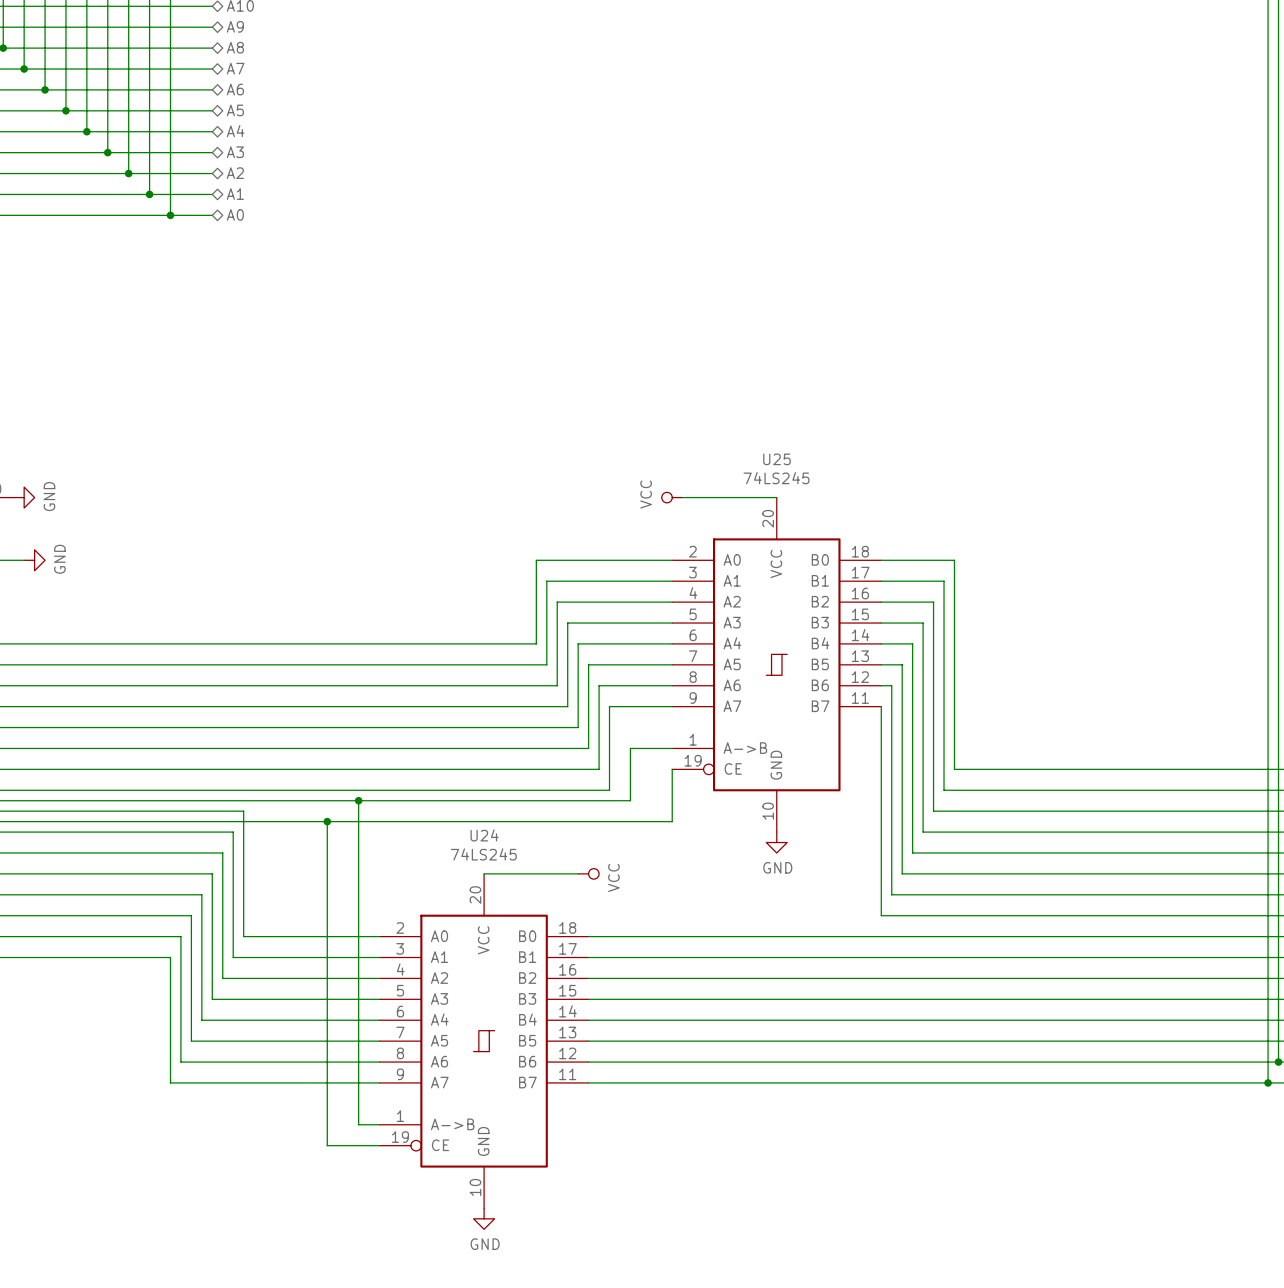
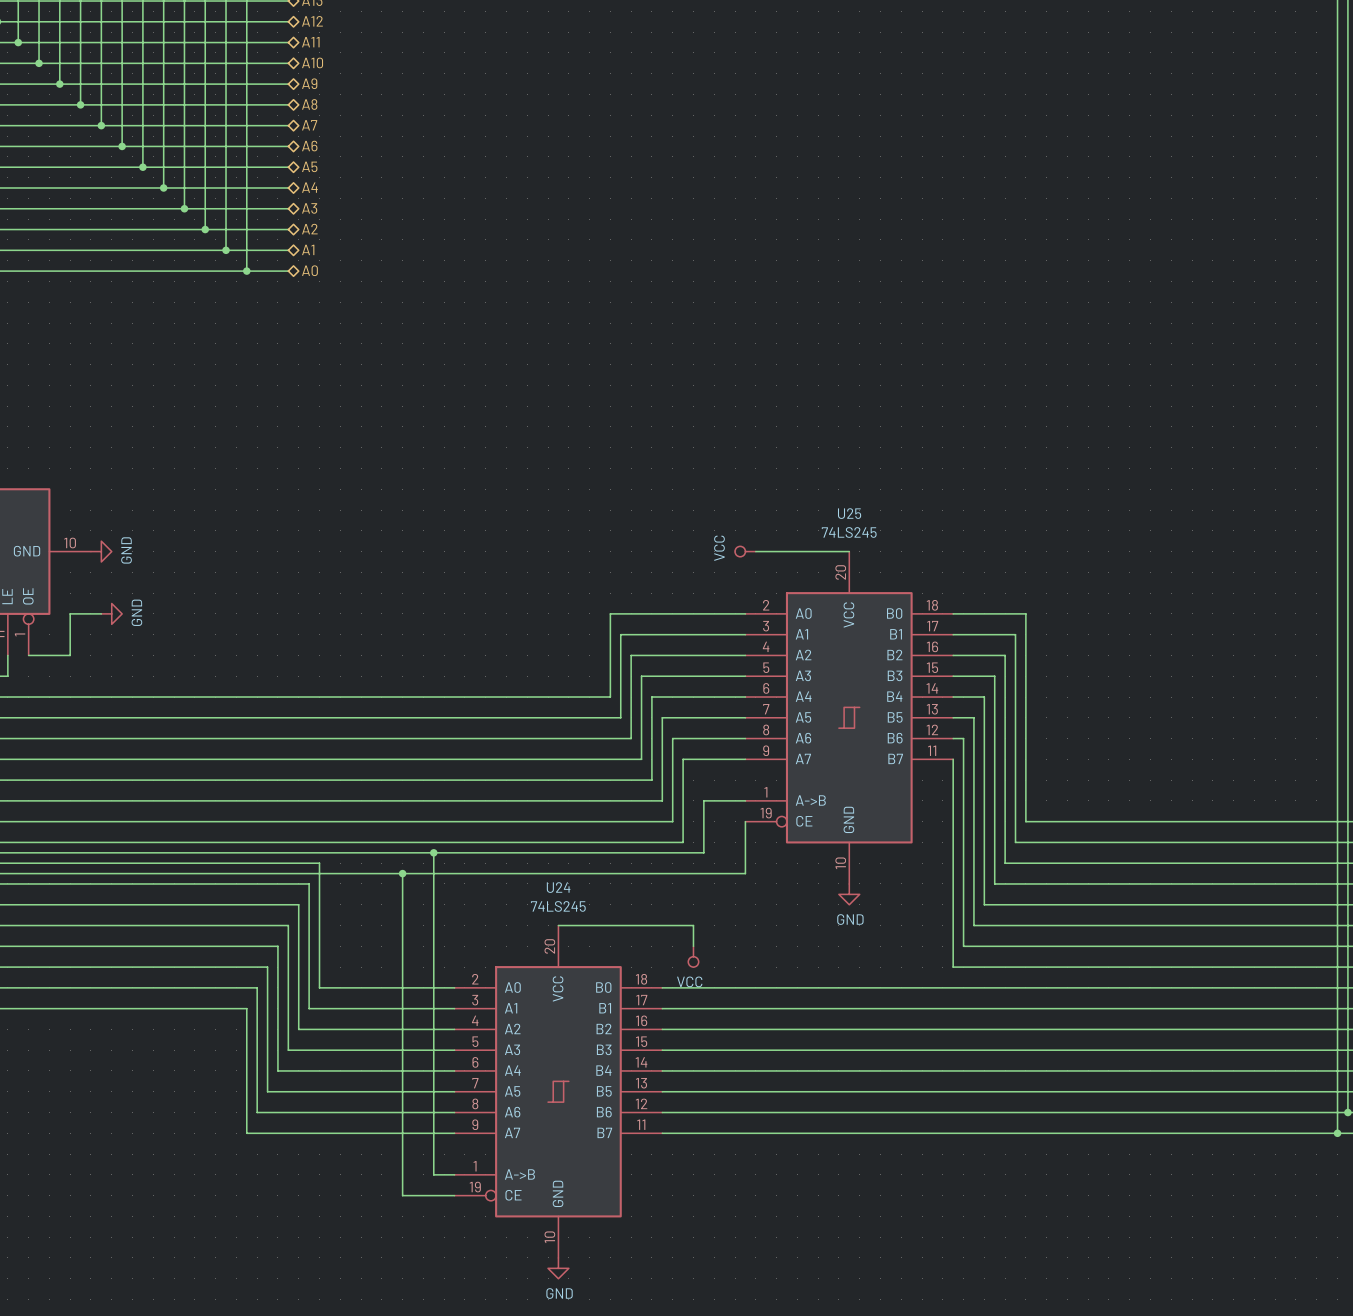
wire: none -> (651, 925) (693, 925) (693, 946)
power symbol rotation: 0° (588, 873) -> 90° clockwise (693, 956)
power symbol position: VCC (588, 873) -> VCC (693, 956)

